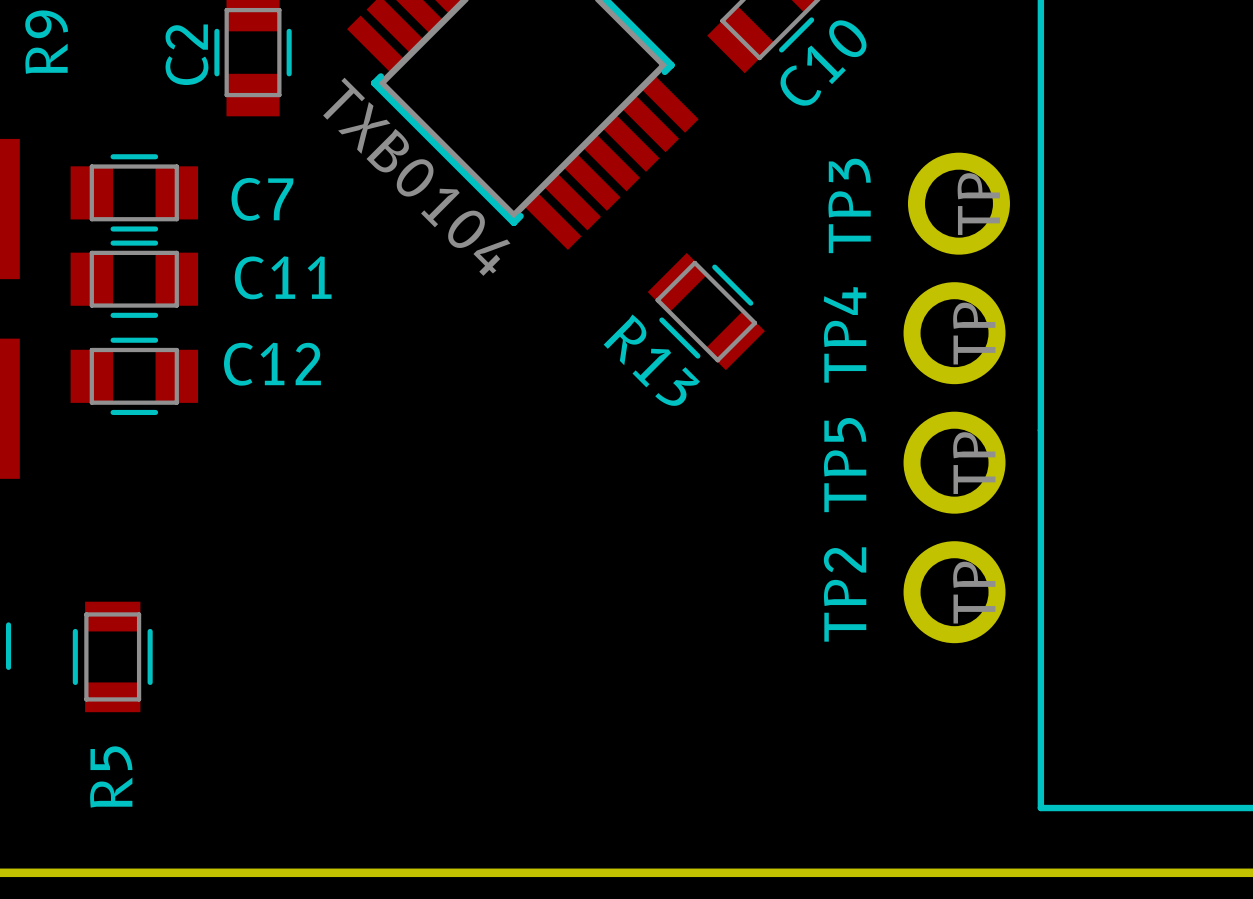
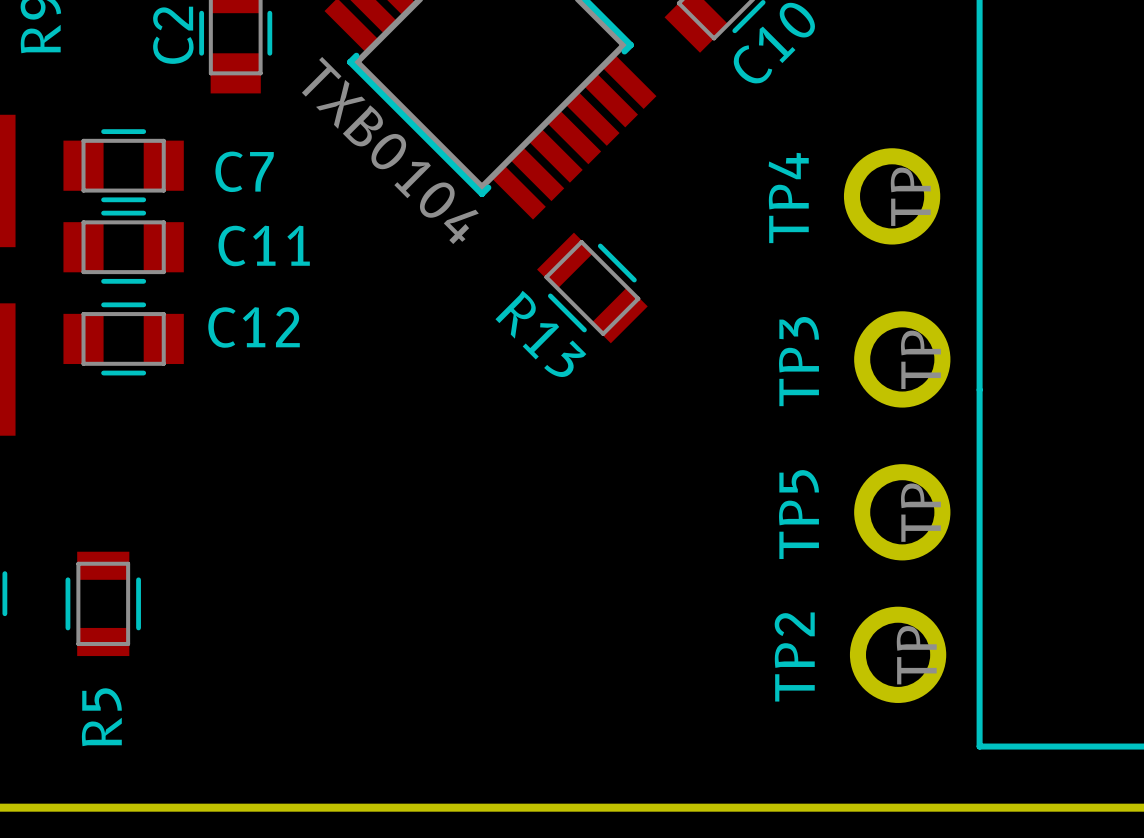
TP3 position: (958, 203) -> (902, 359)
R13 position: (706, 311) -> (592, 287)
TP4 position: (954, 333) -> (892, 196)
TP5 position: (954, 462) -> (902, 512)
TP2 position: (954, 592) -> (898, 654)

